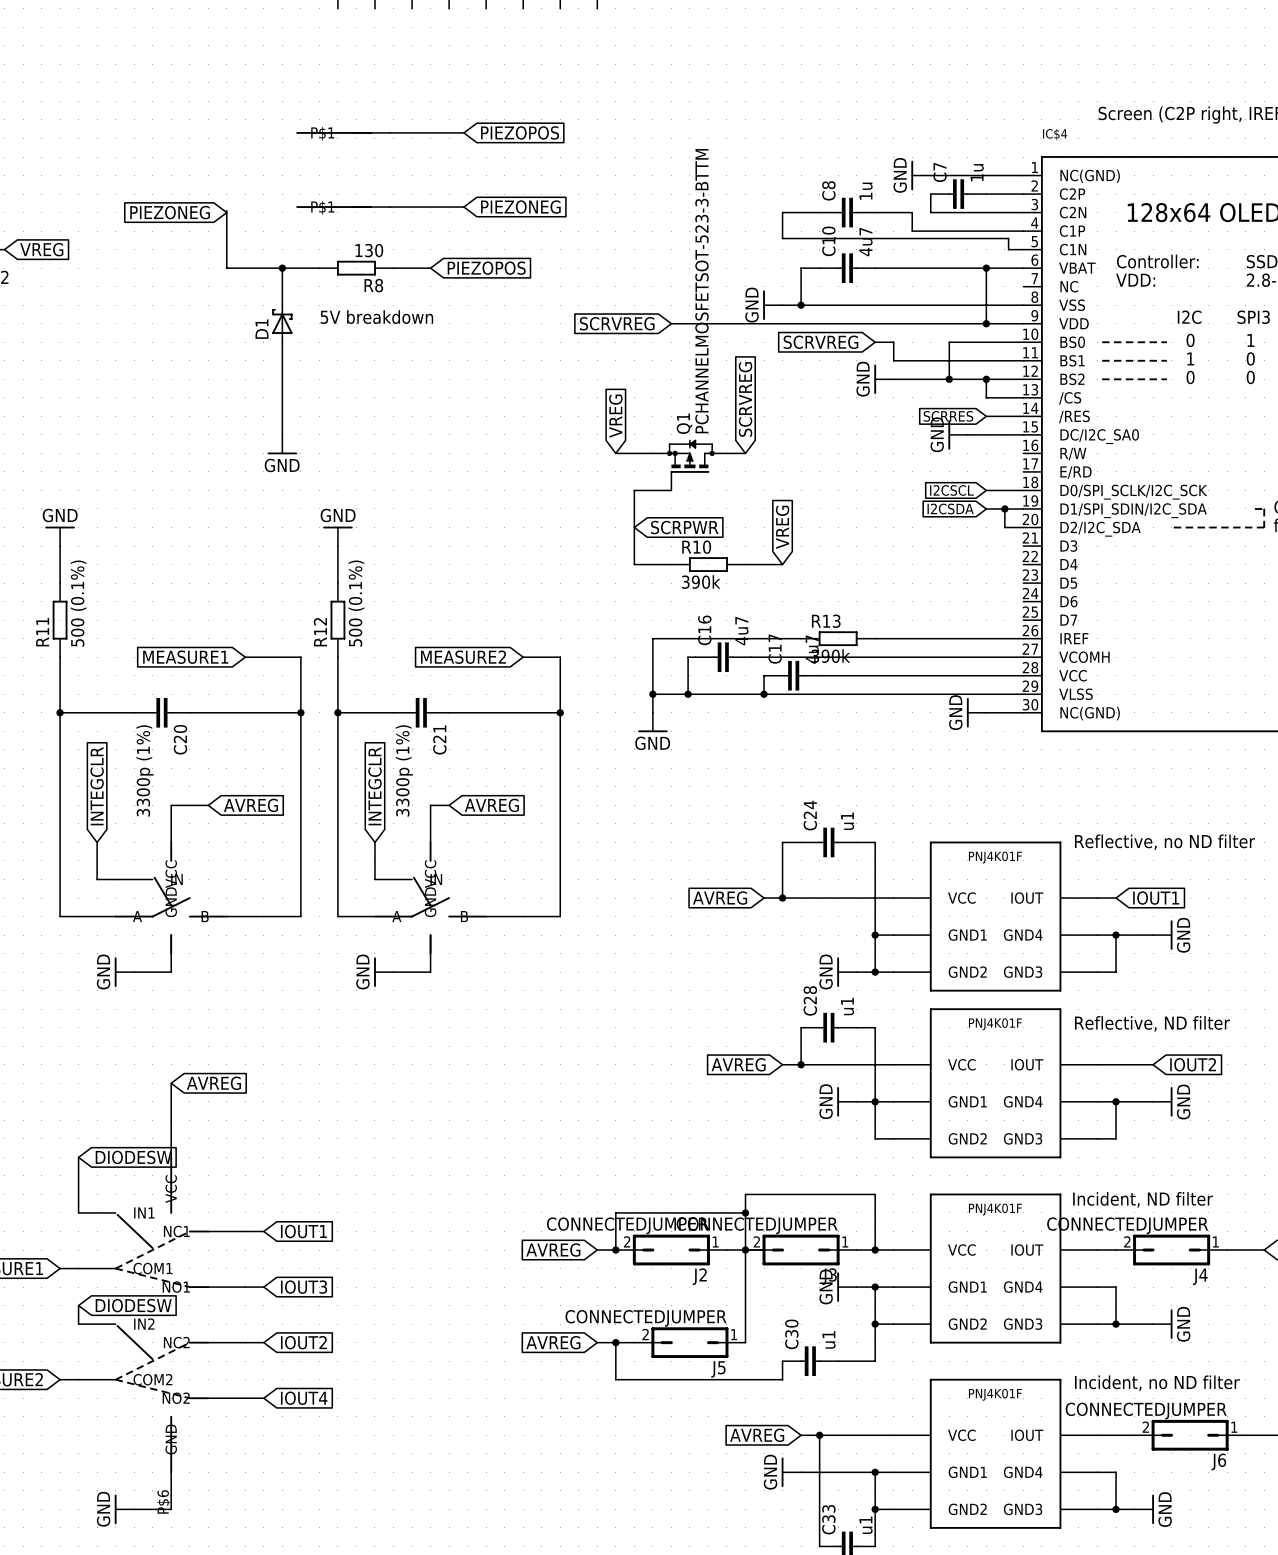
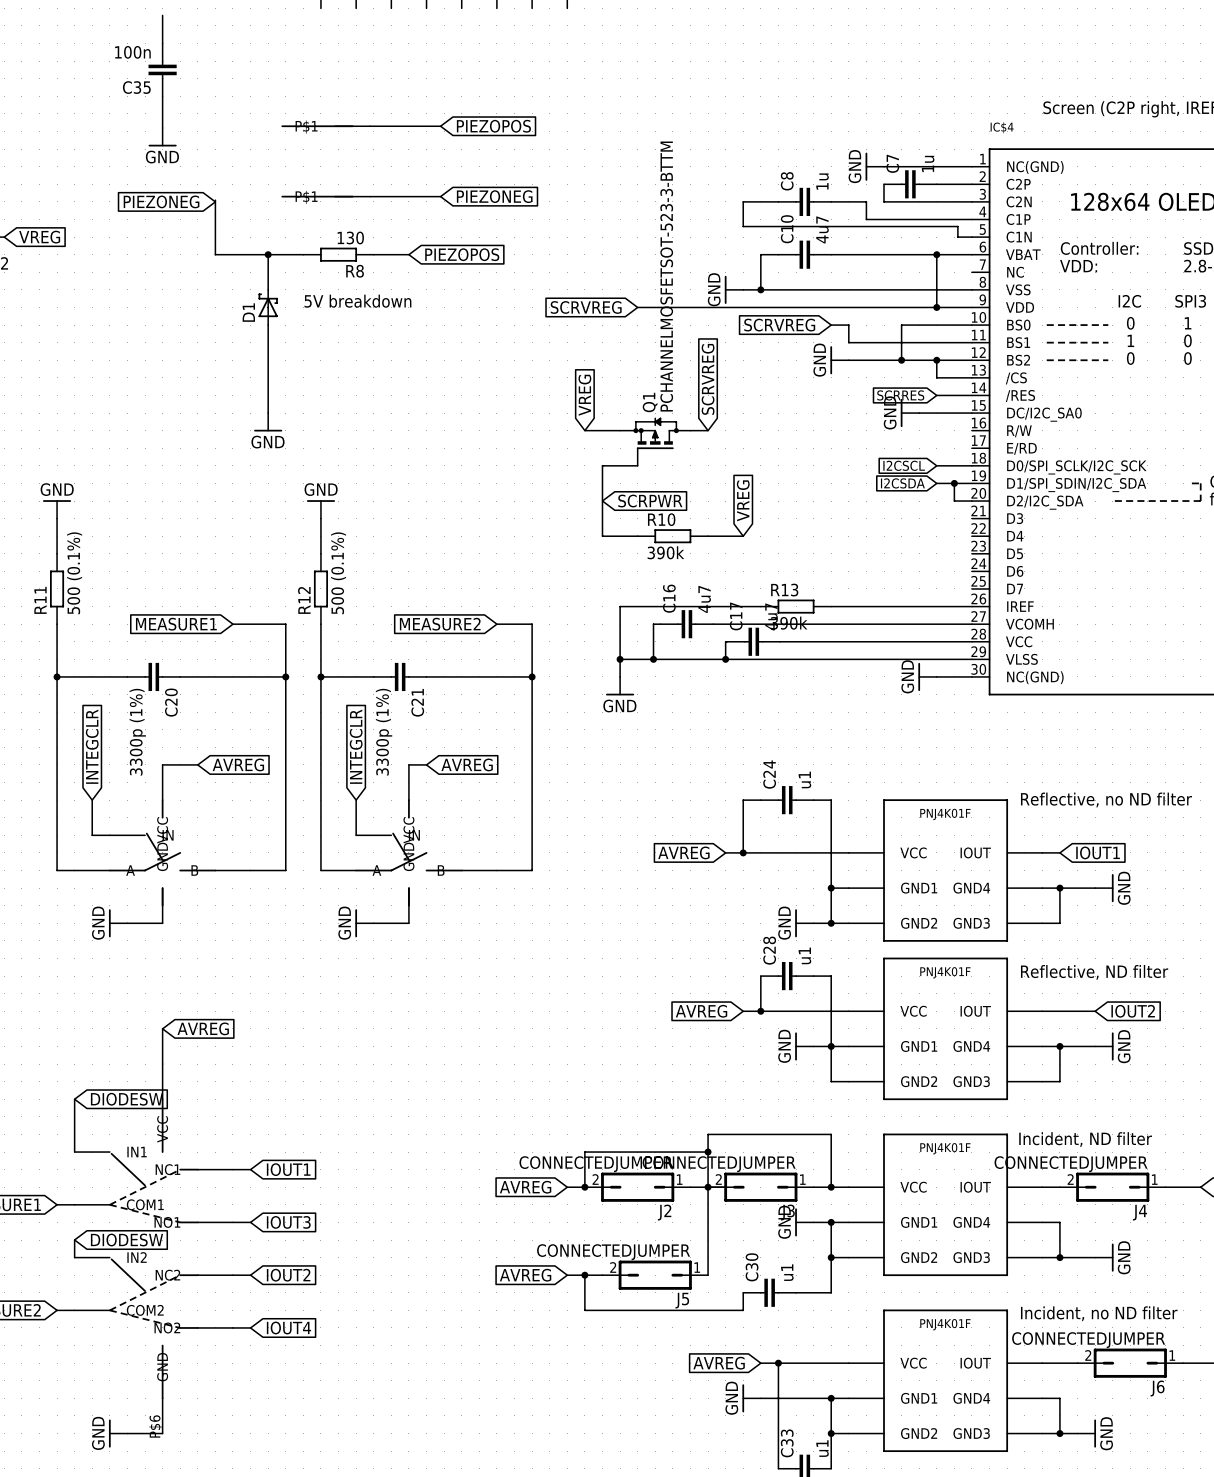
wire: none -> (162, 15) (162, 43)
C35: none -> 100n (162, 69)
wire: none -> (162, 96) (162, 128)
power symbol: none -> GND (162, 137)

